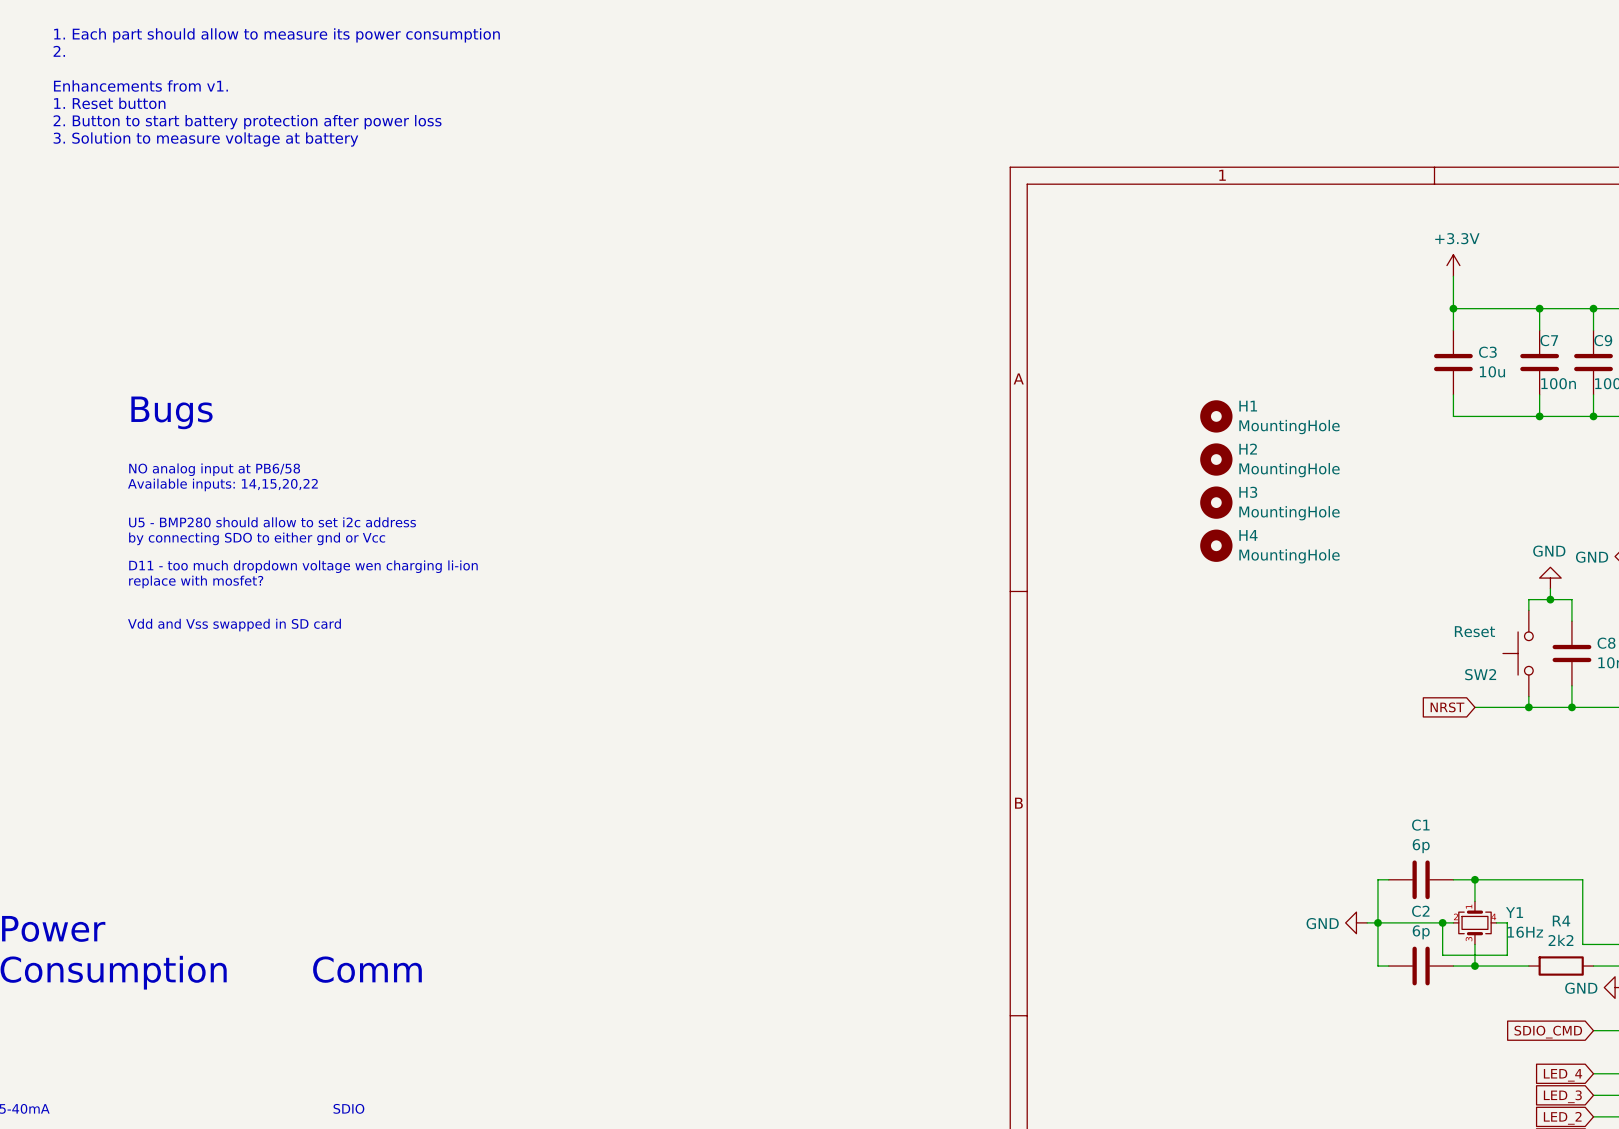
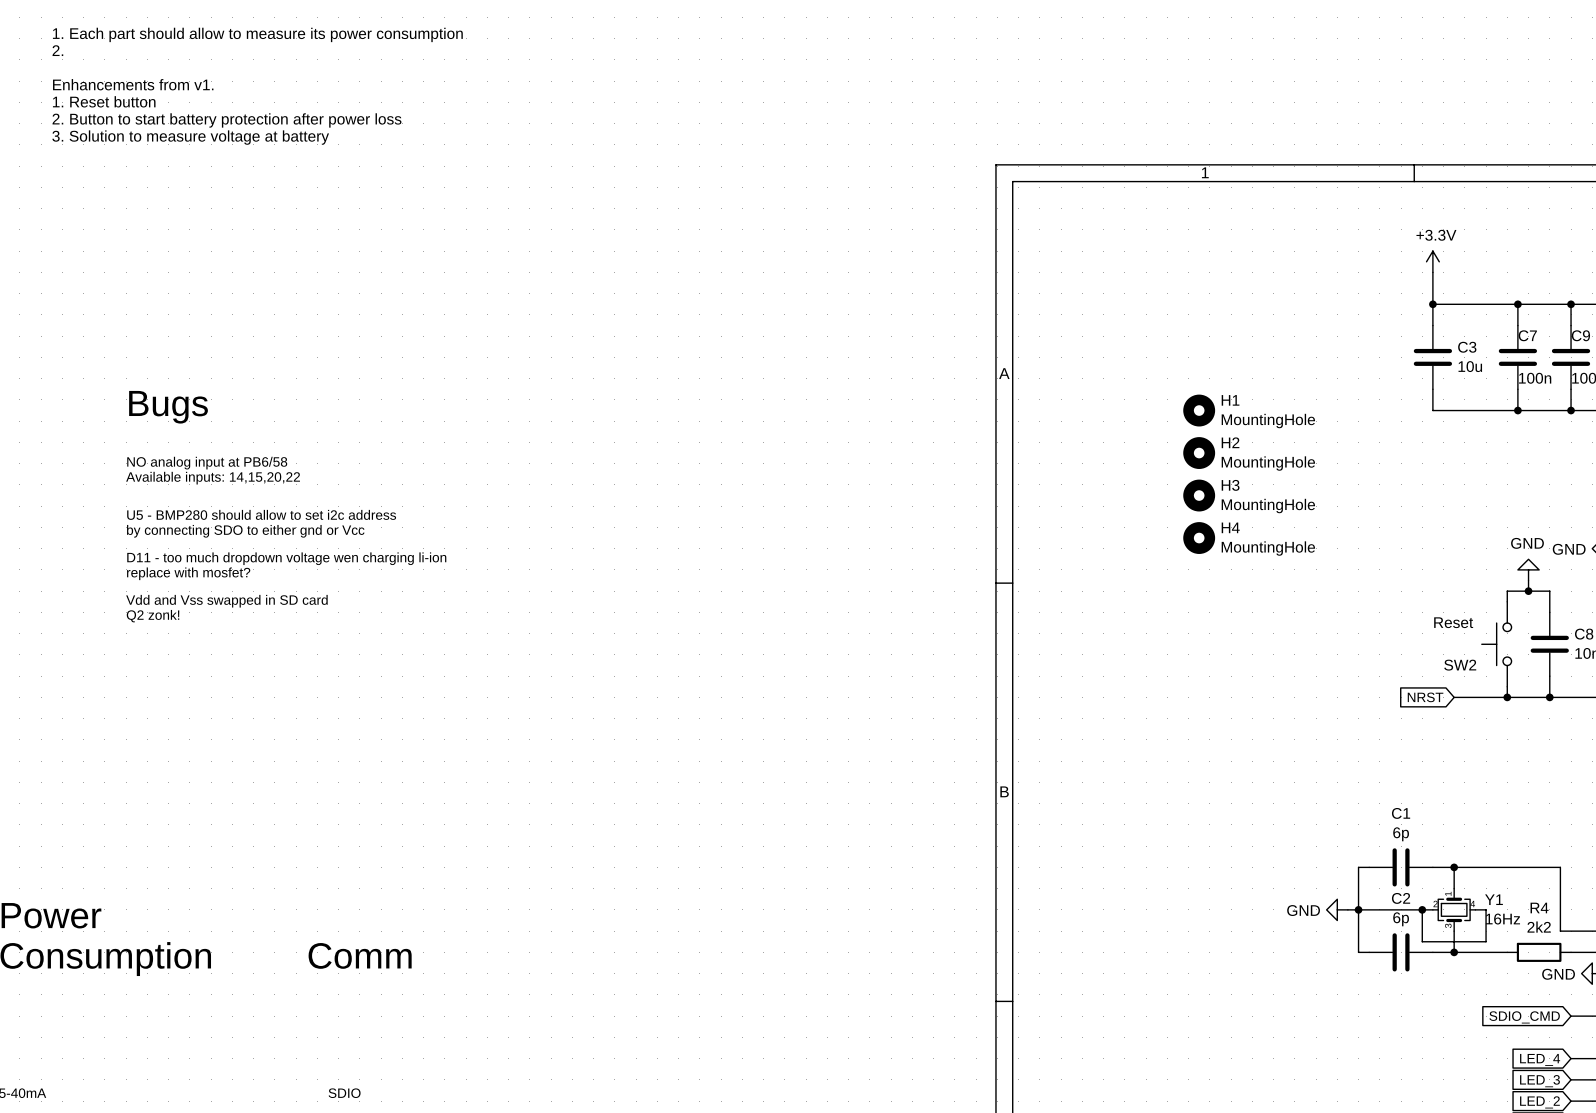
text: none -> Vdd and Vss swapped in SD card (226, 601)
text: Vdd and Vss swapped in SD card (234, 625) -> Q2 zonk! (153, 616)

